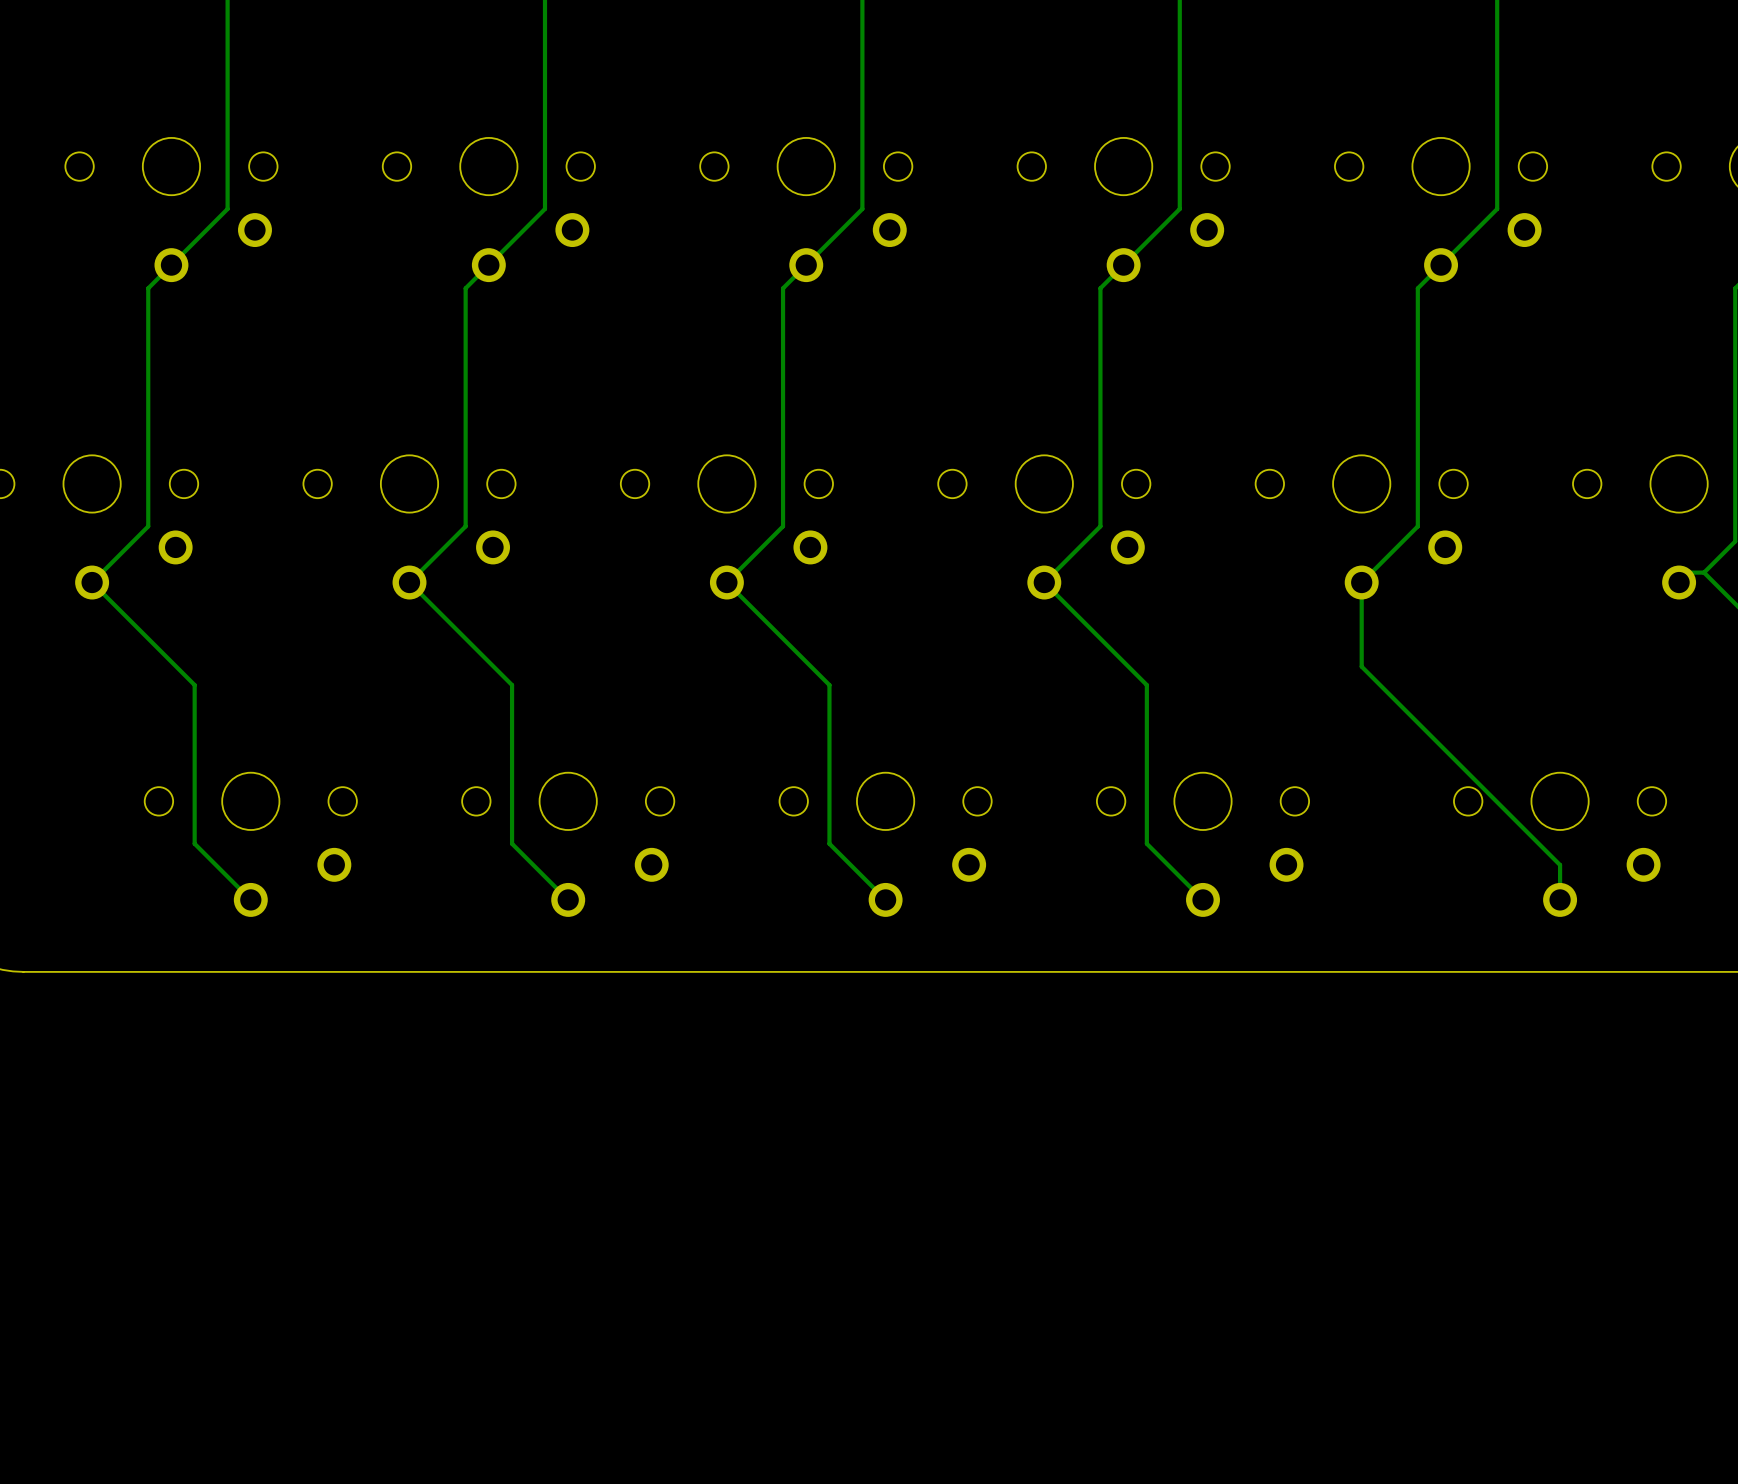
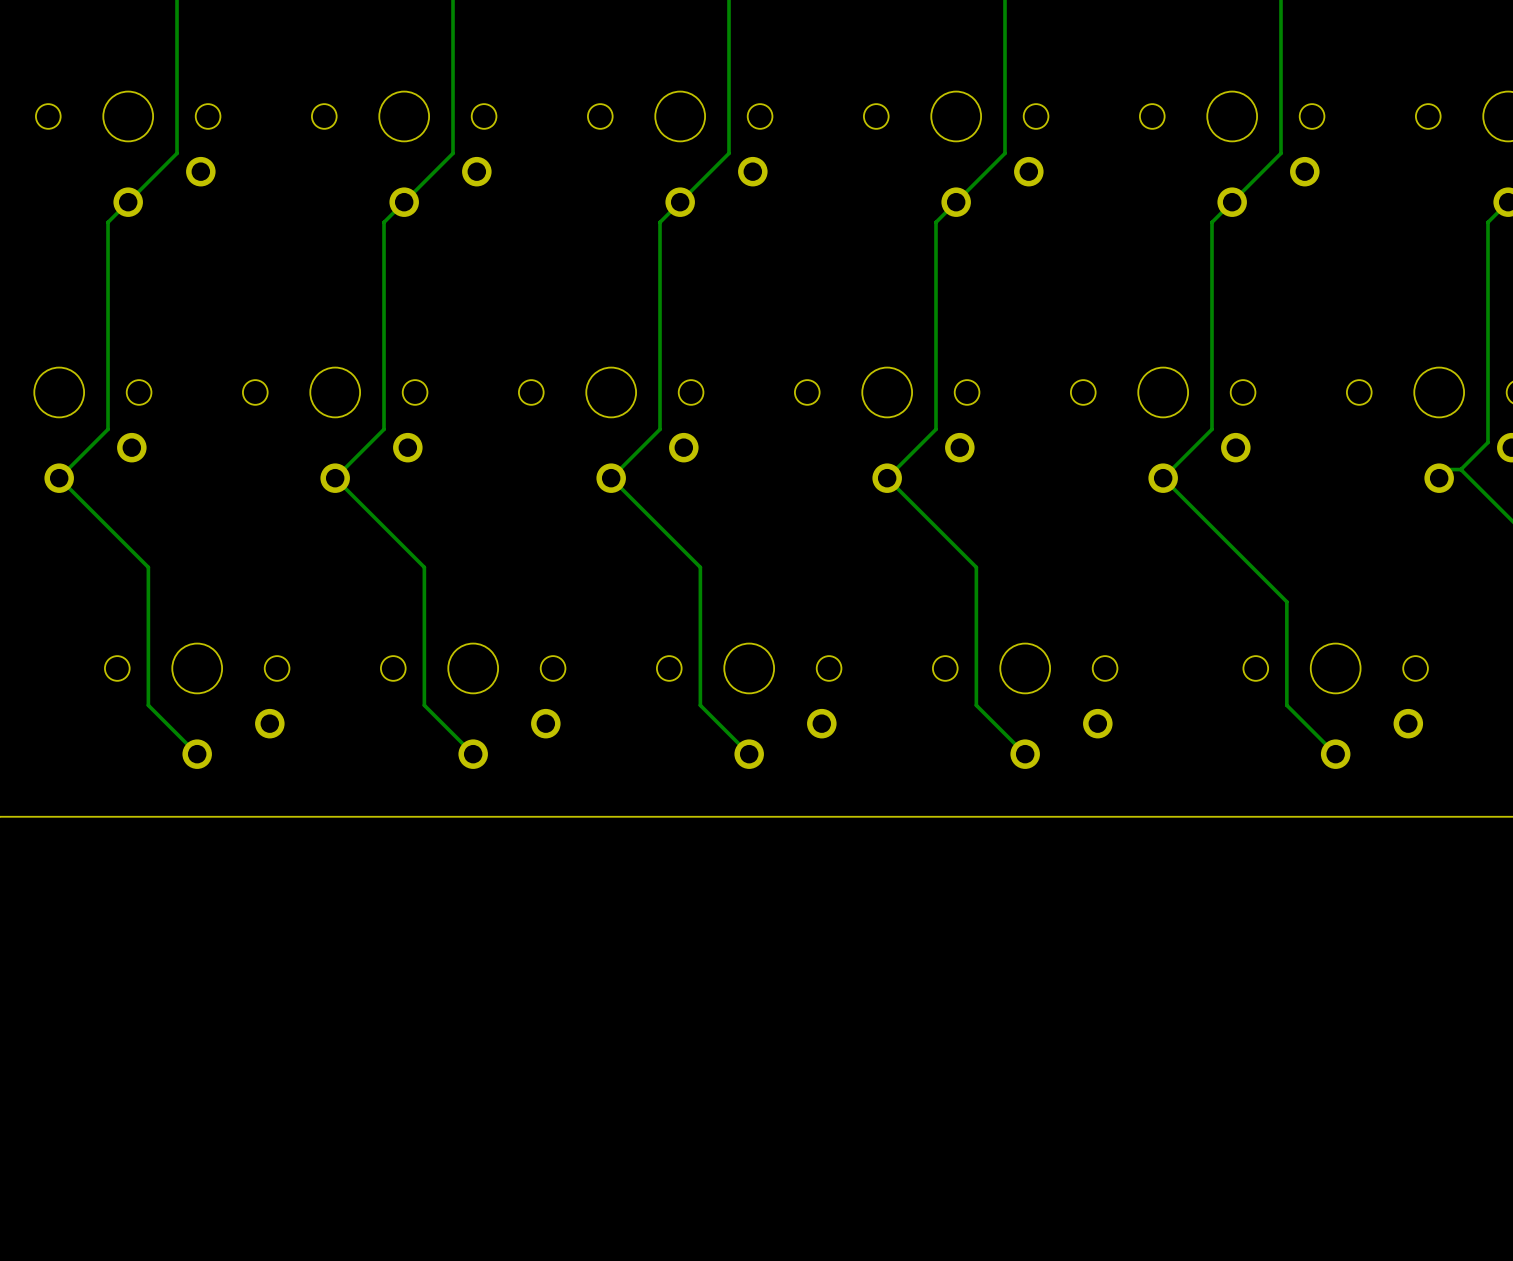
track: (1361, 582) (1361, 666) (1560, 865) (1560, 899) -> (1163, 478) (1286, 601) (1286, 705) (1335, 754)

